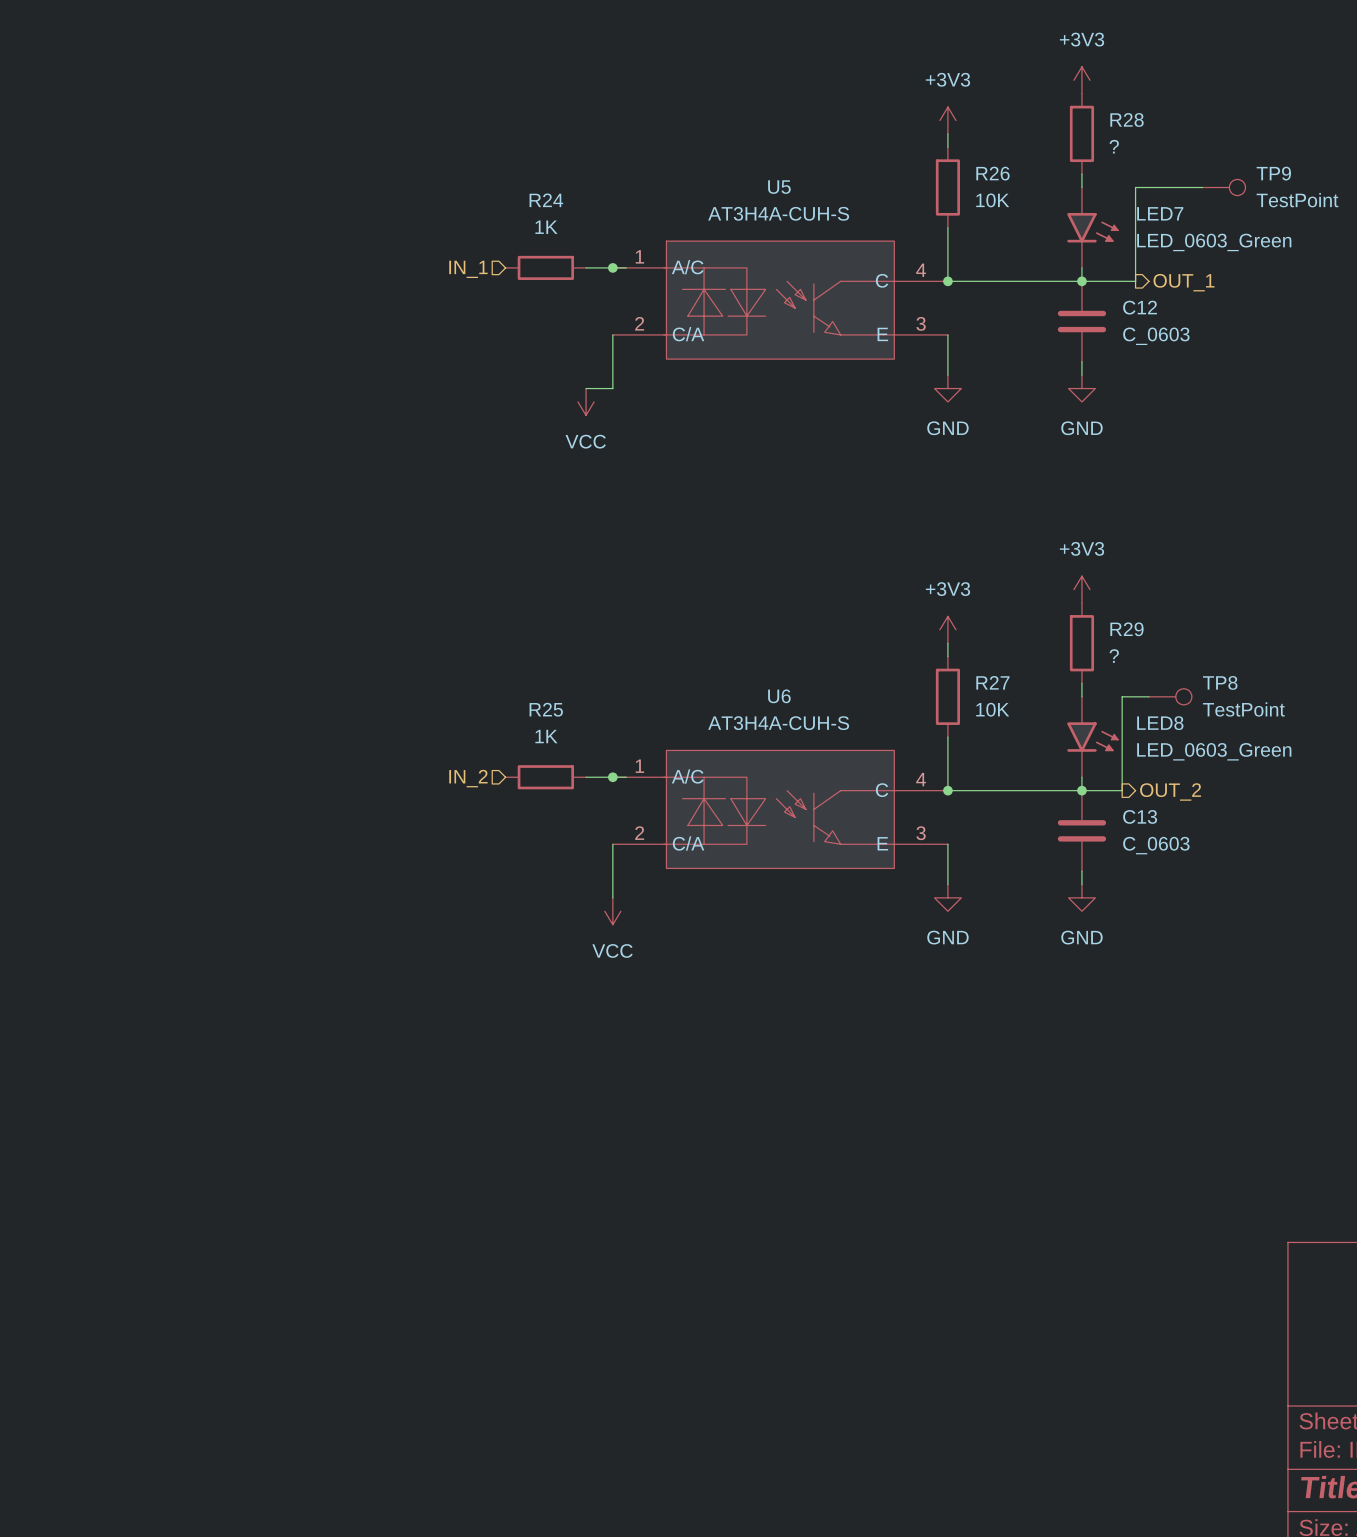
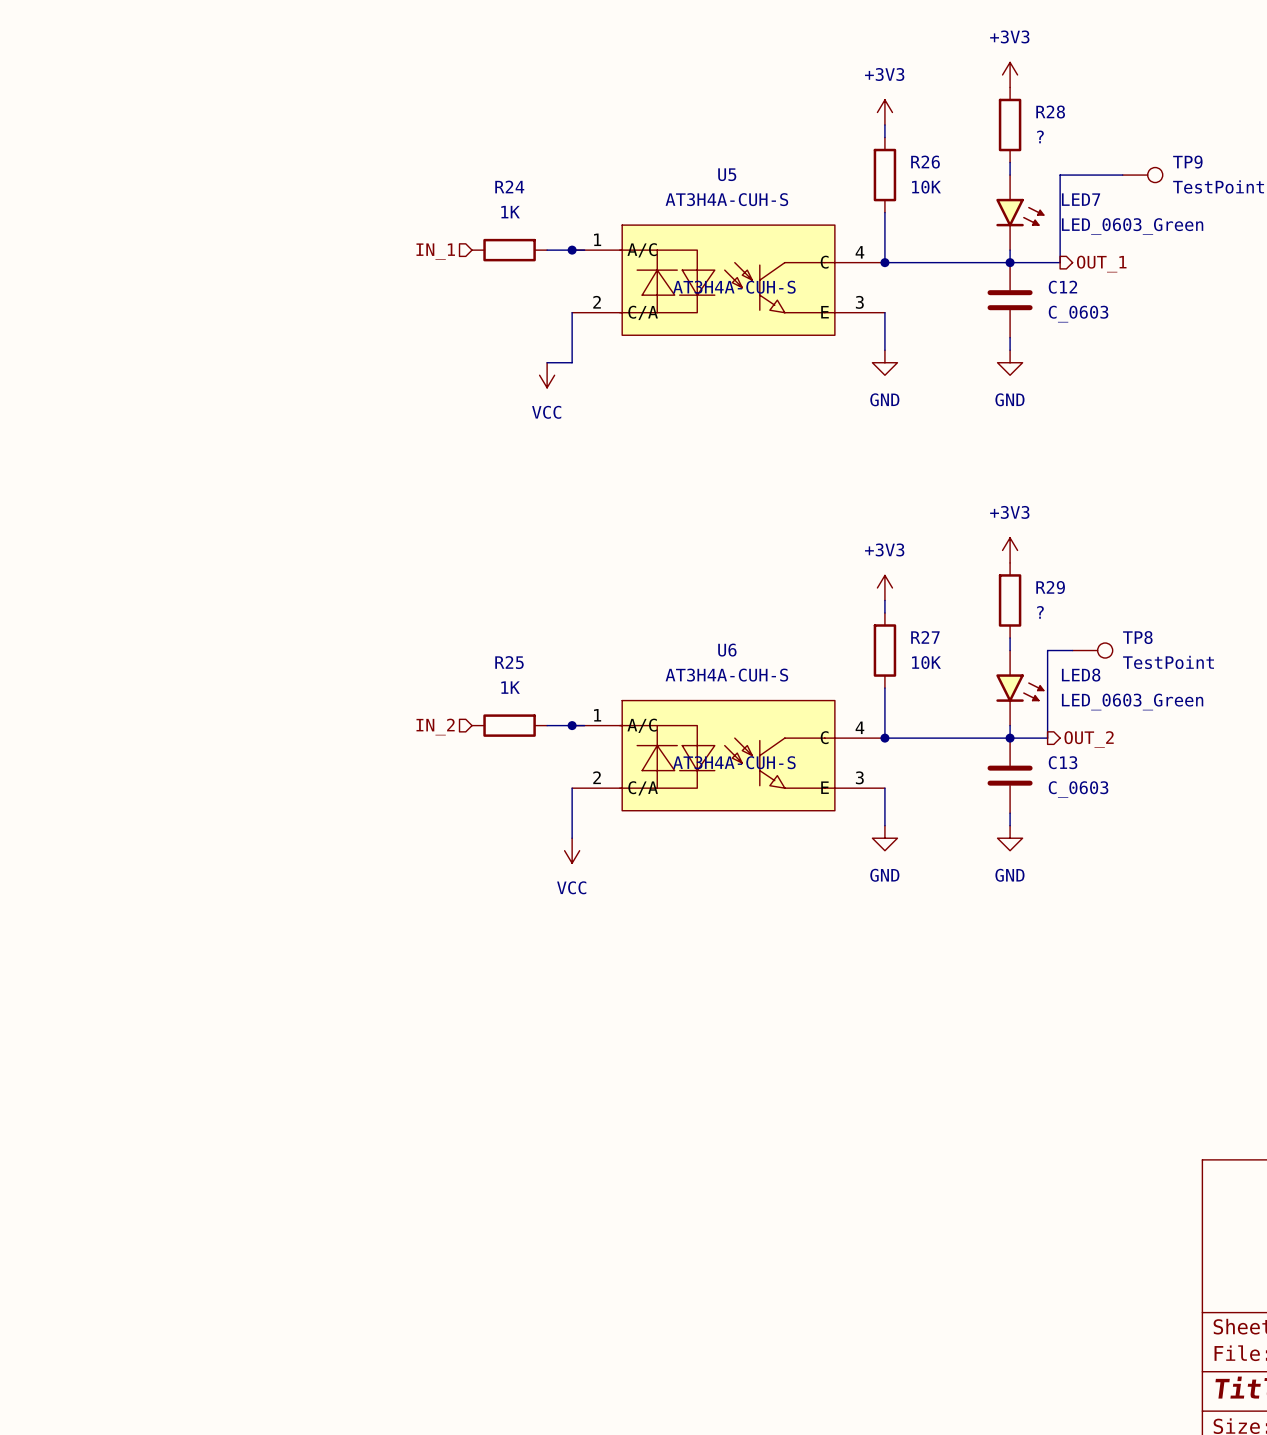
U5 text: none -> AT3H4A-CUH-S (734, 287)
U6 text: none -> AT3H4A-CUH-S (734, 762)

